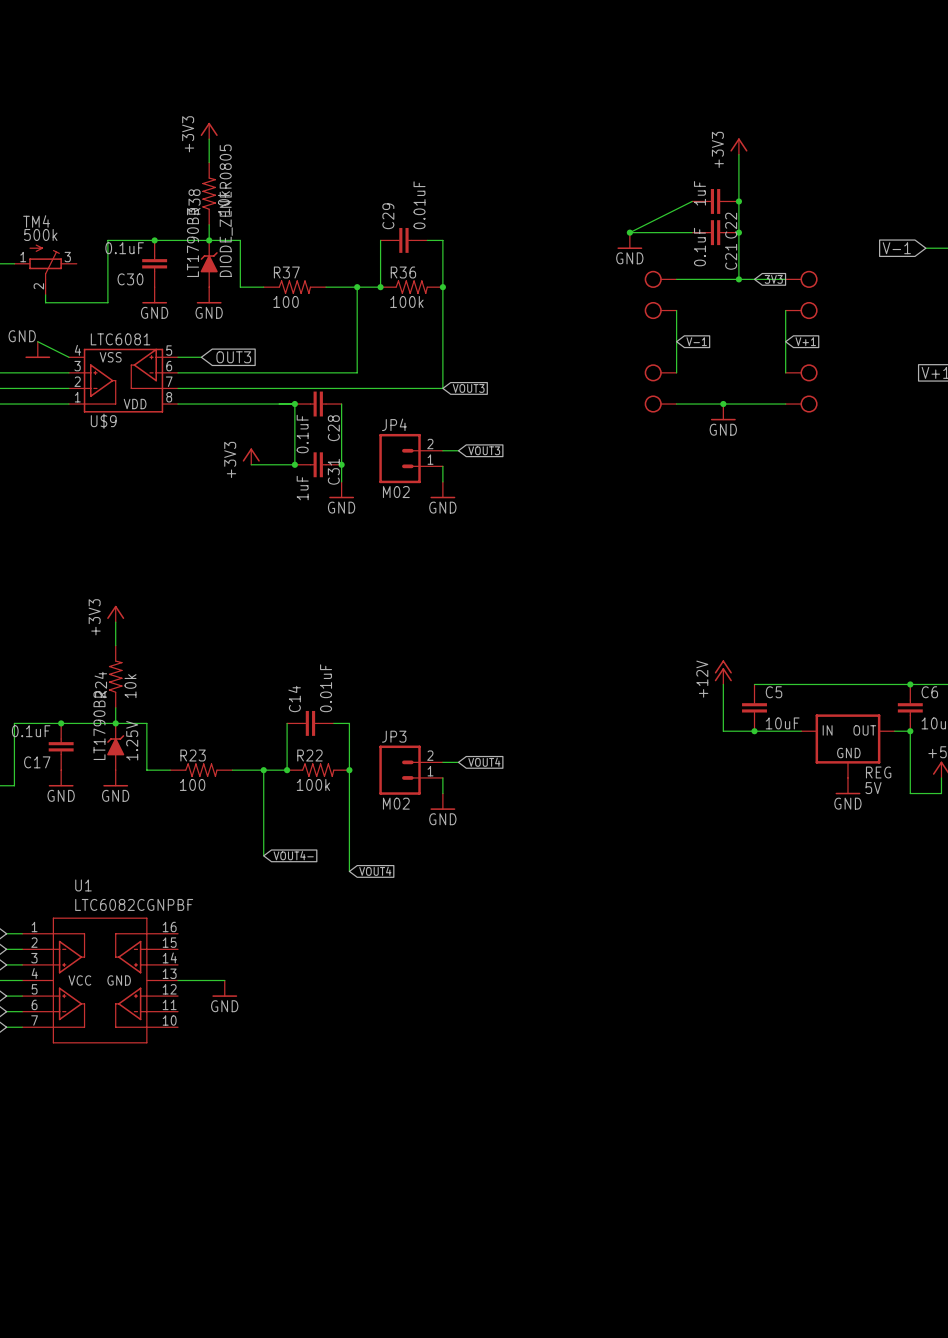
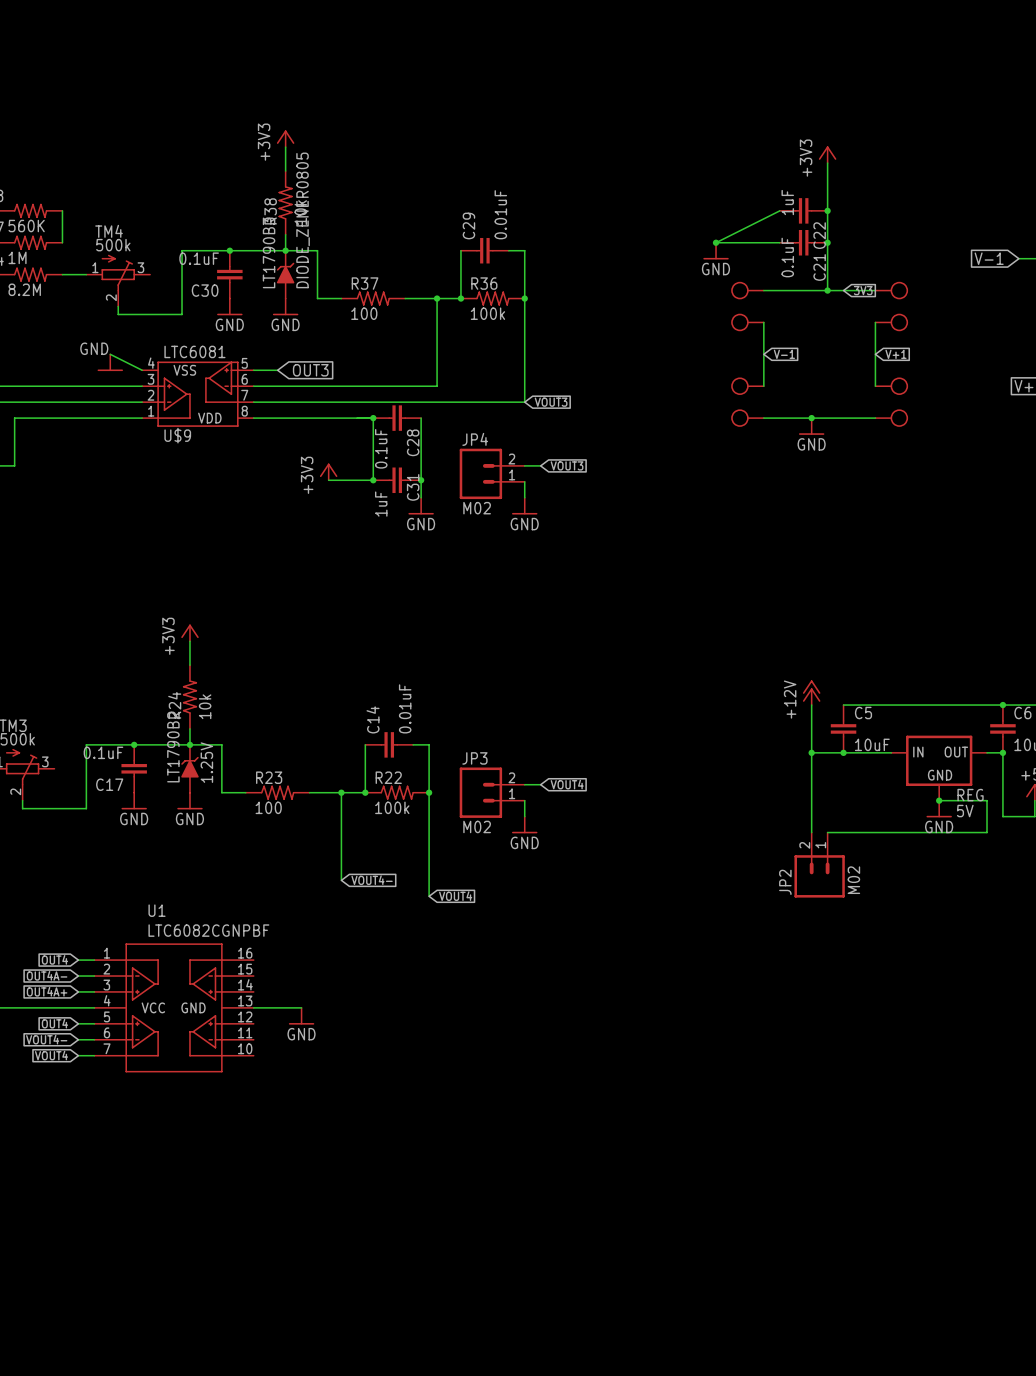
wire: none -> (811, 752) (811, 832)
junction: none -> (811, 752)
wire: none -> (939, 800) (987, 800) (987, 832) (827, 832)
junction: none -> (939, 800)
JP2: none -> M02 (819, 865)

